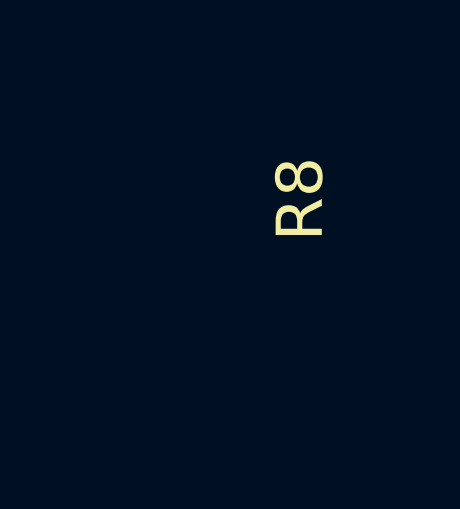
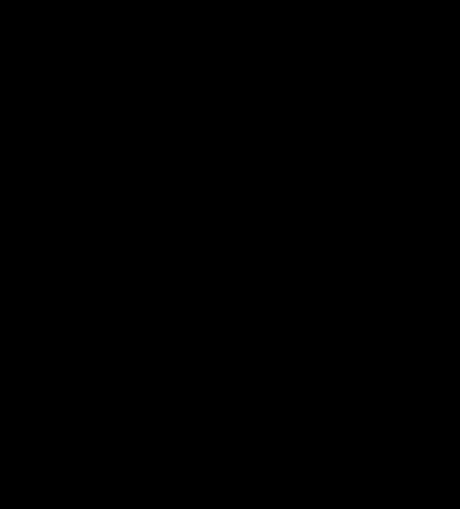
R8: (298, 198) -> none

